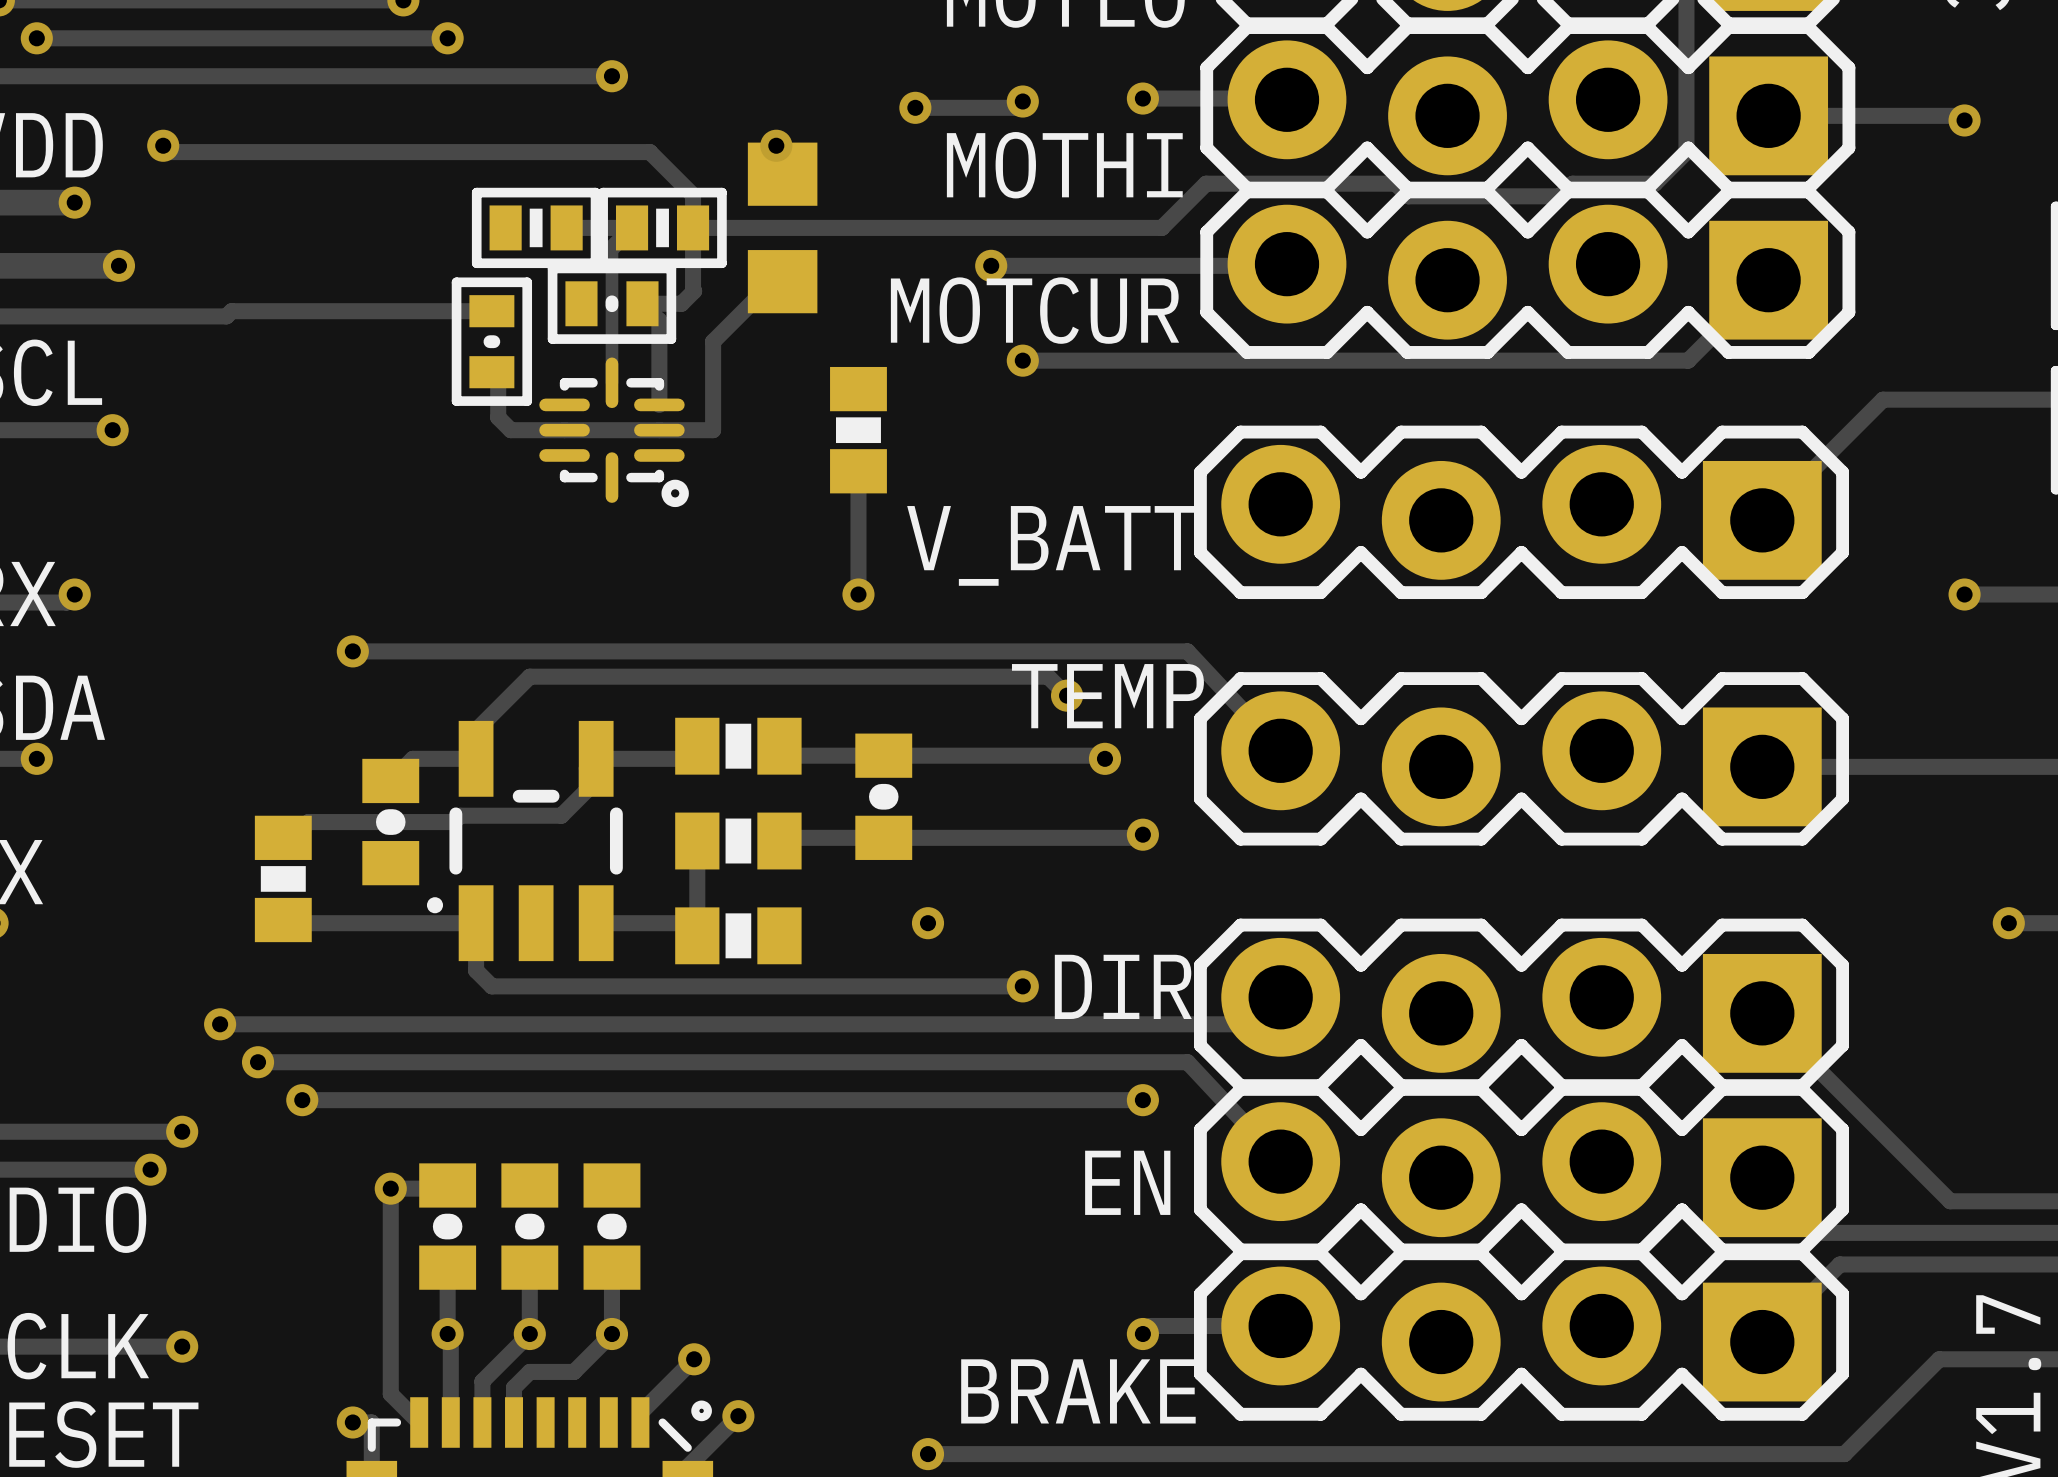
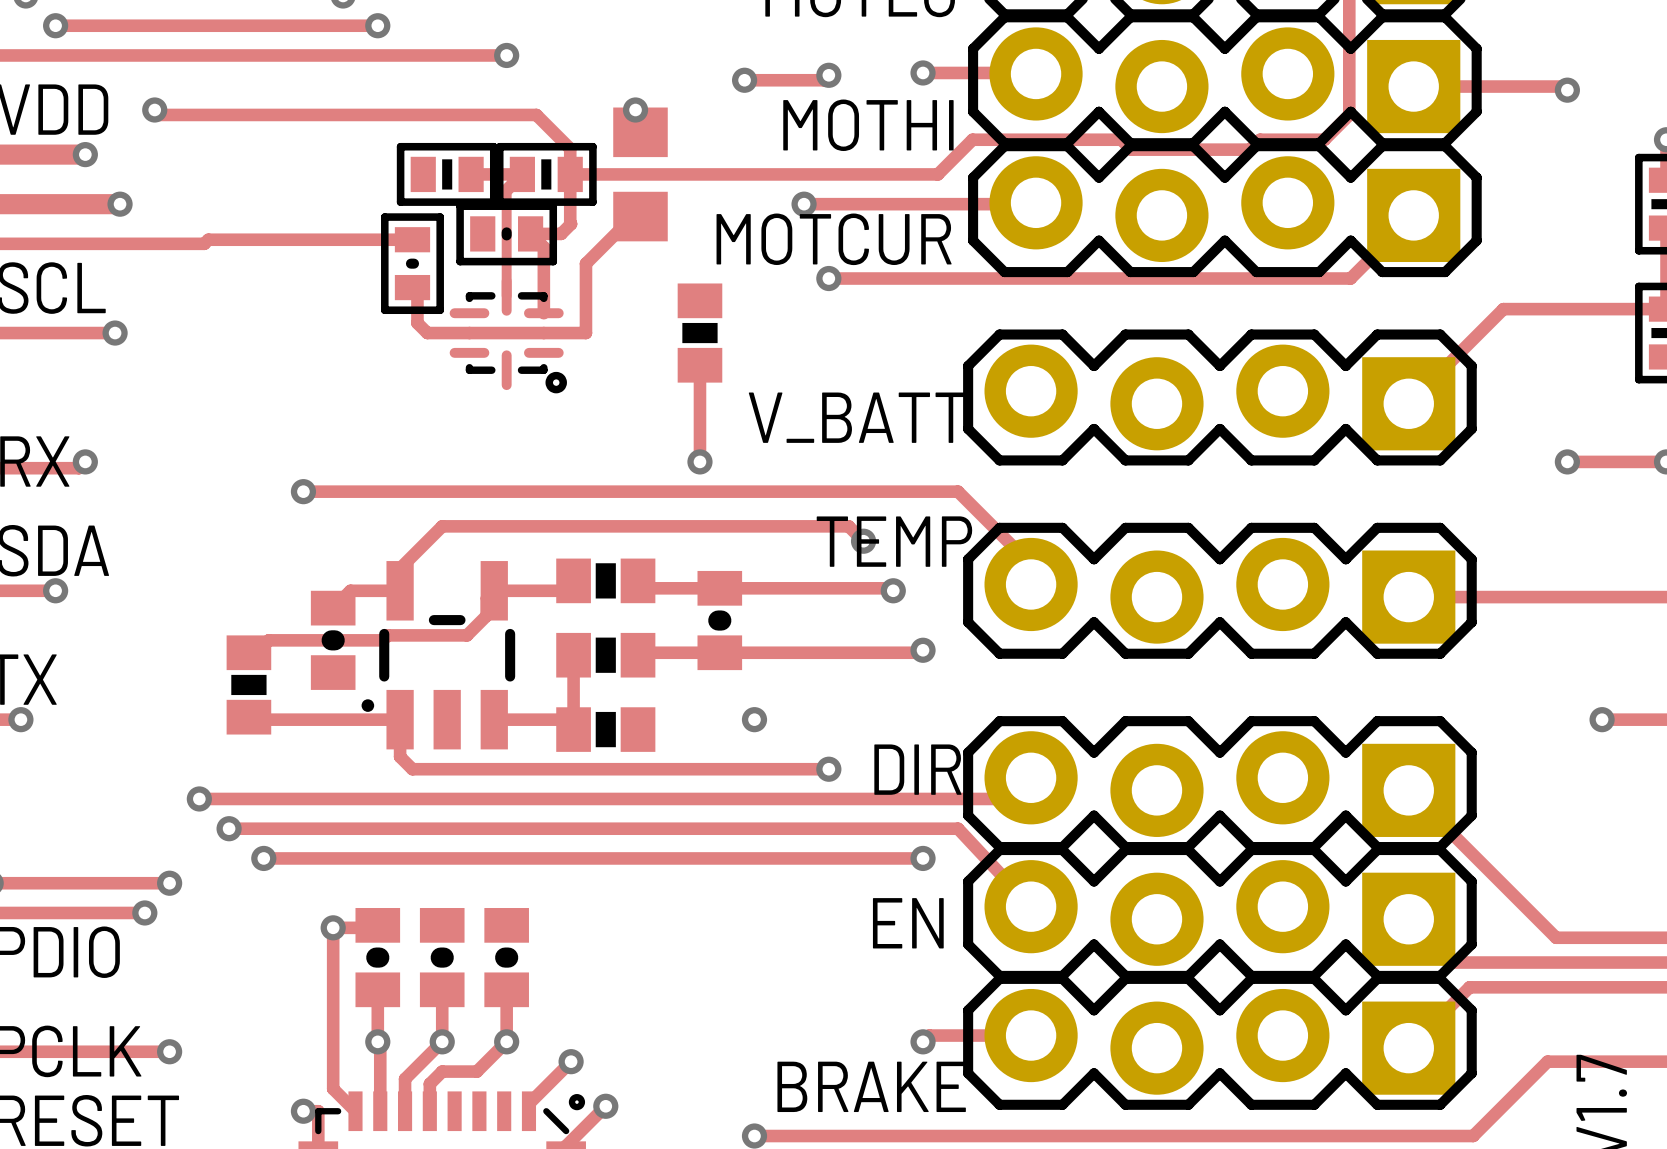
track: (352, 651) (1187, 651) (1280, 750) -> (303, 491) (958, 491) (1031, 564) (1031, 584)
via position: (352, 651) -> (303, 491)

